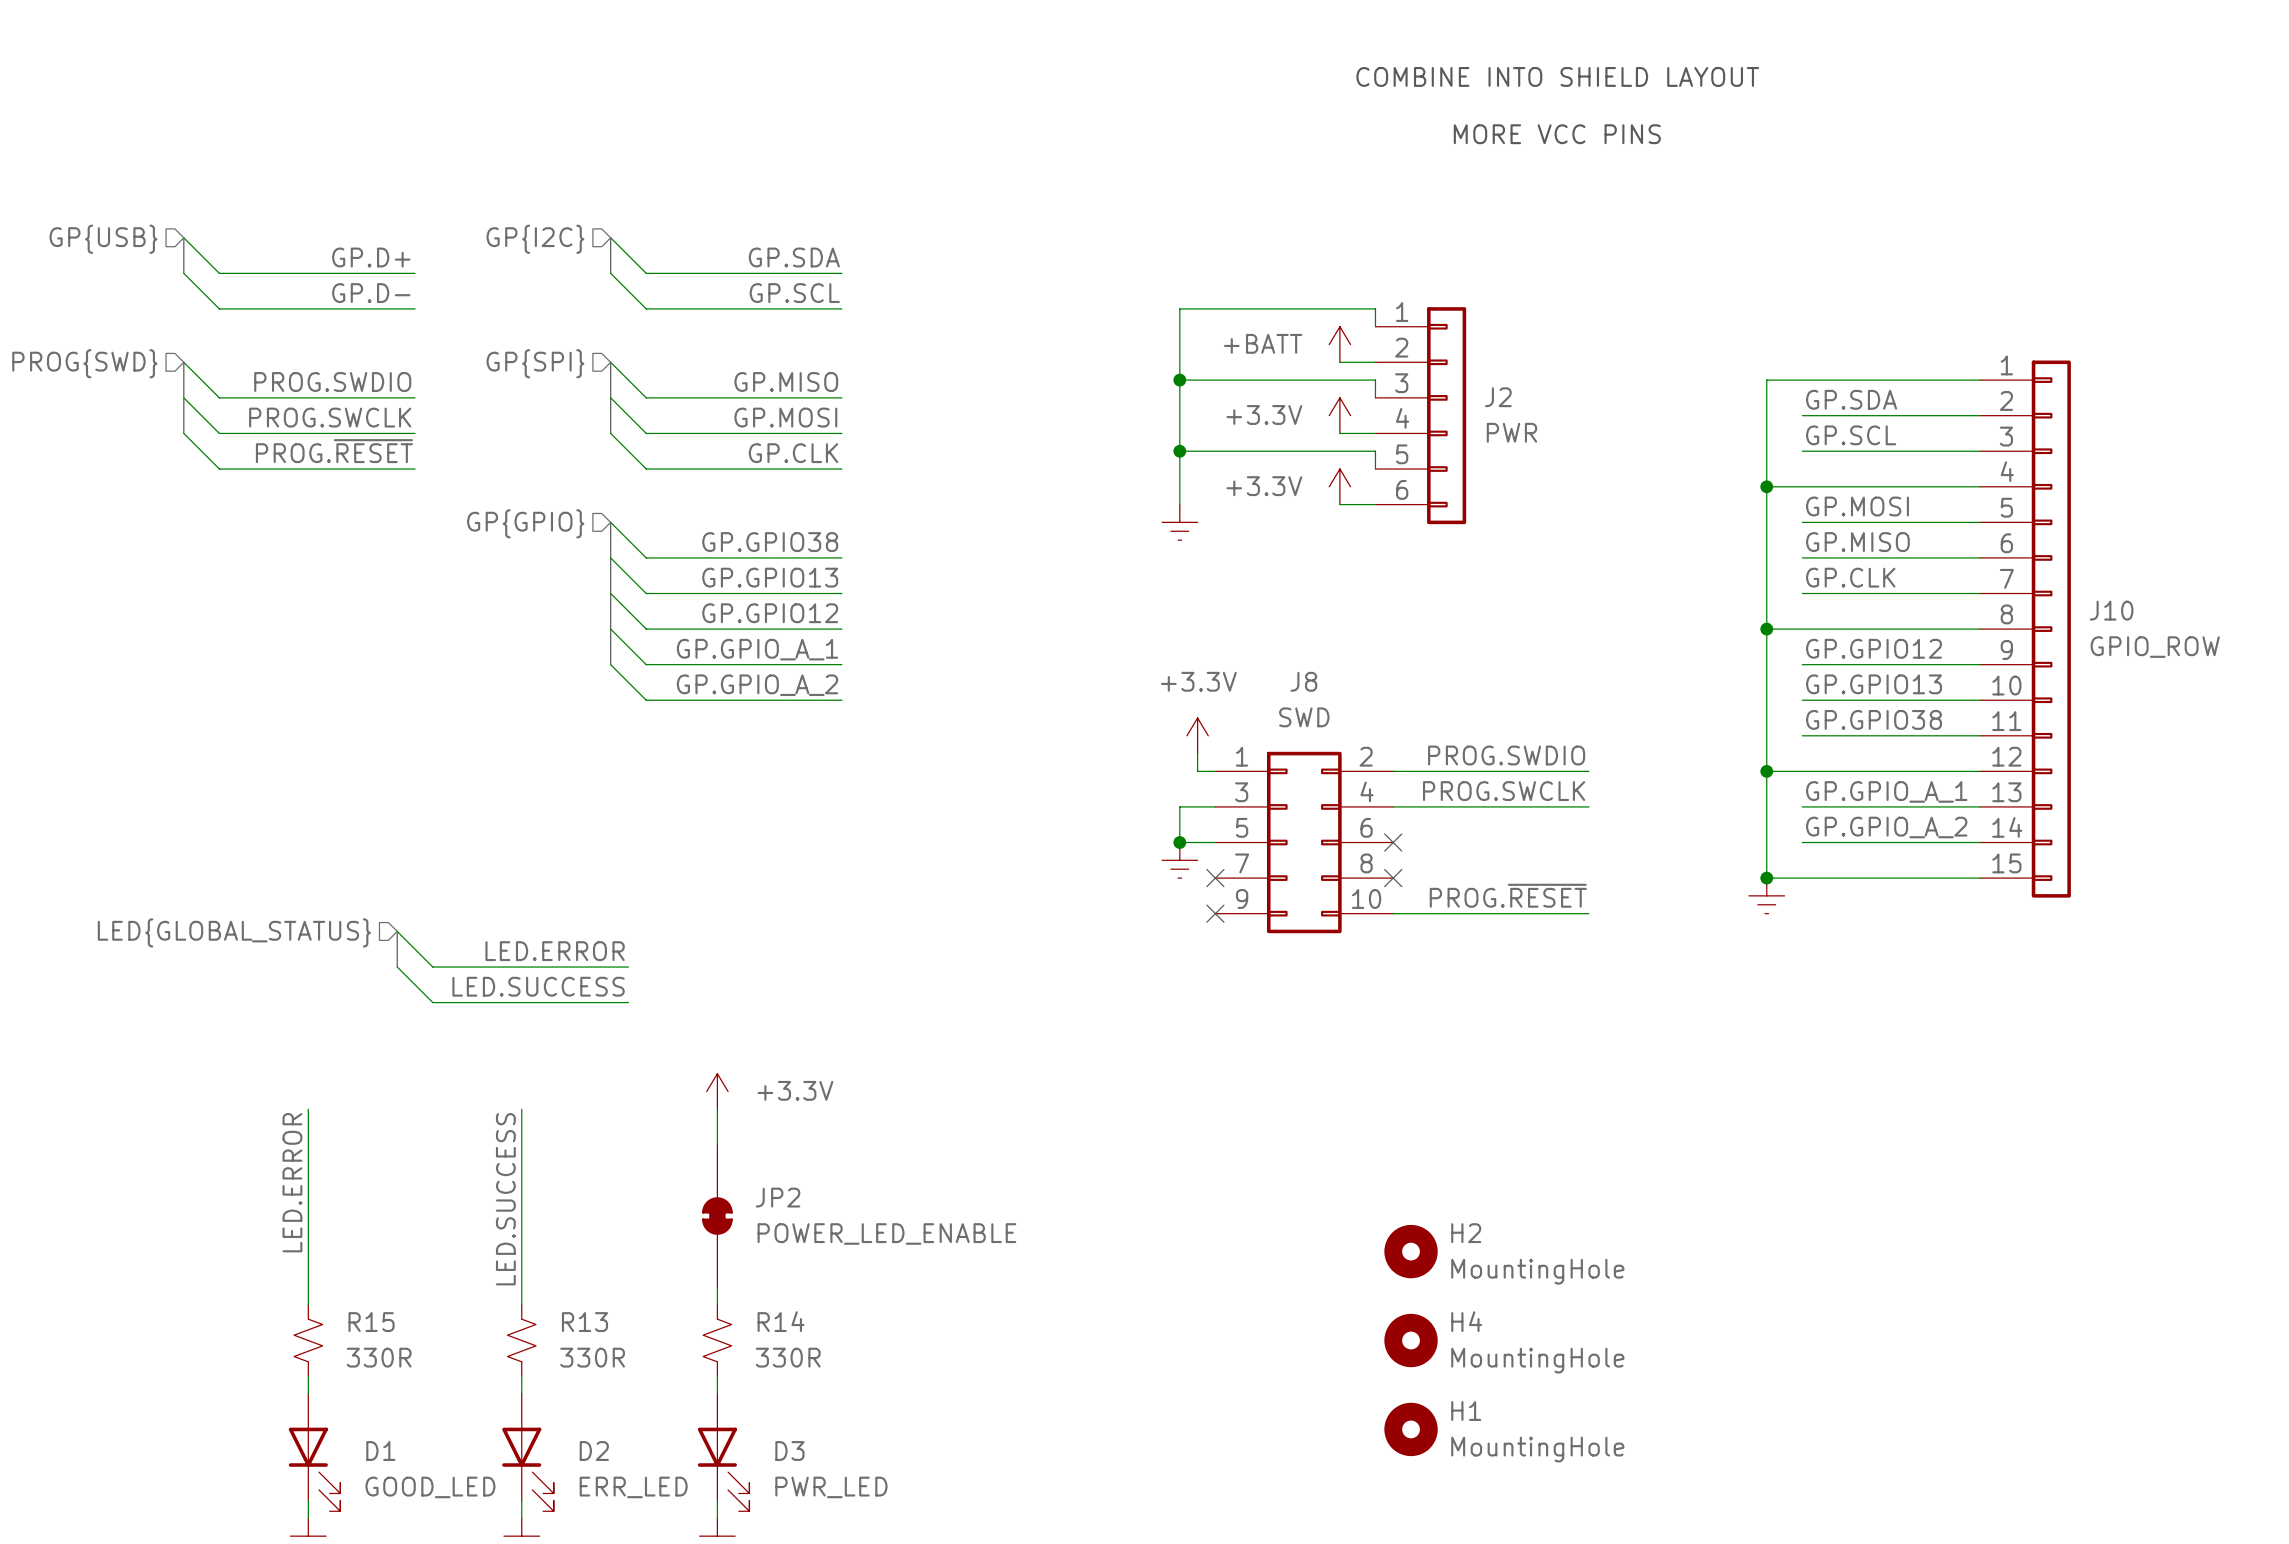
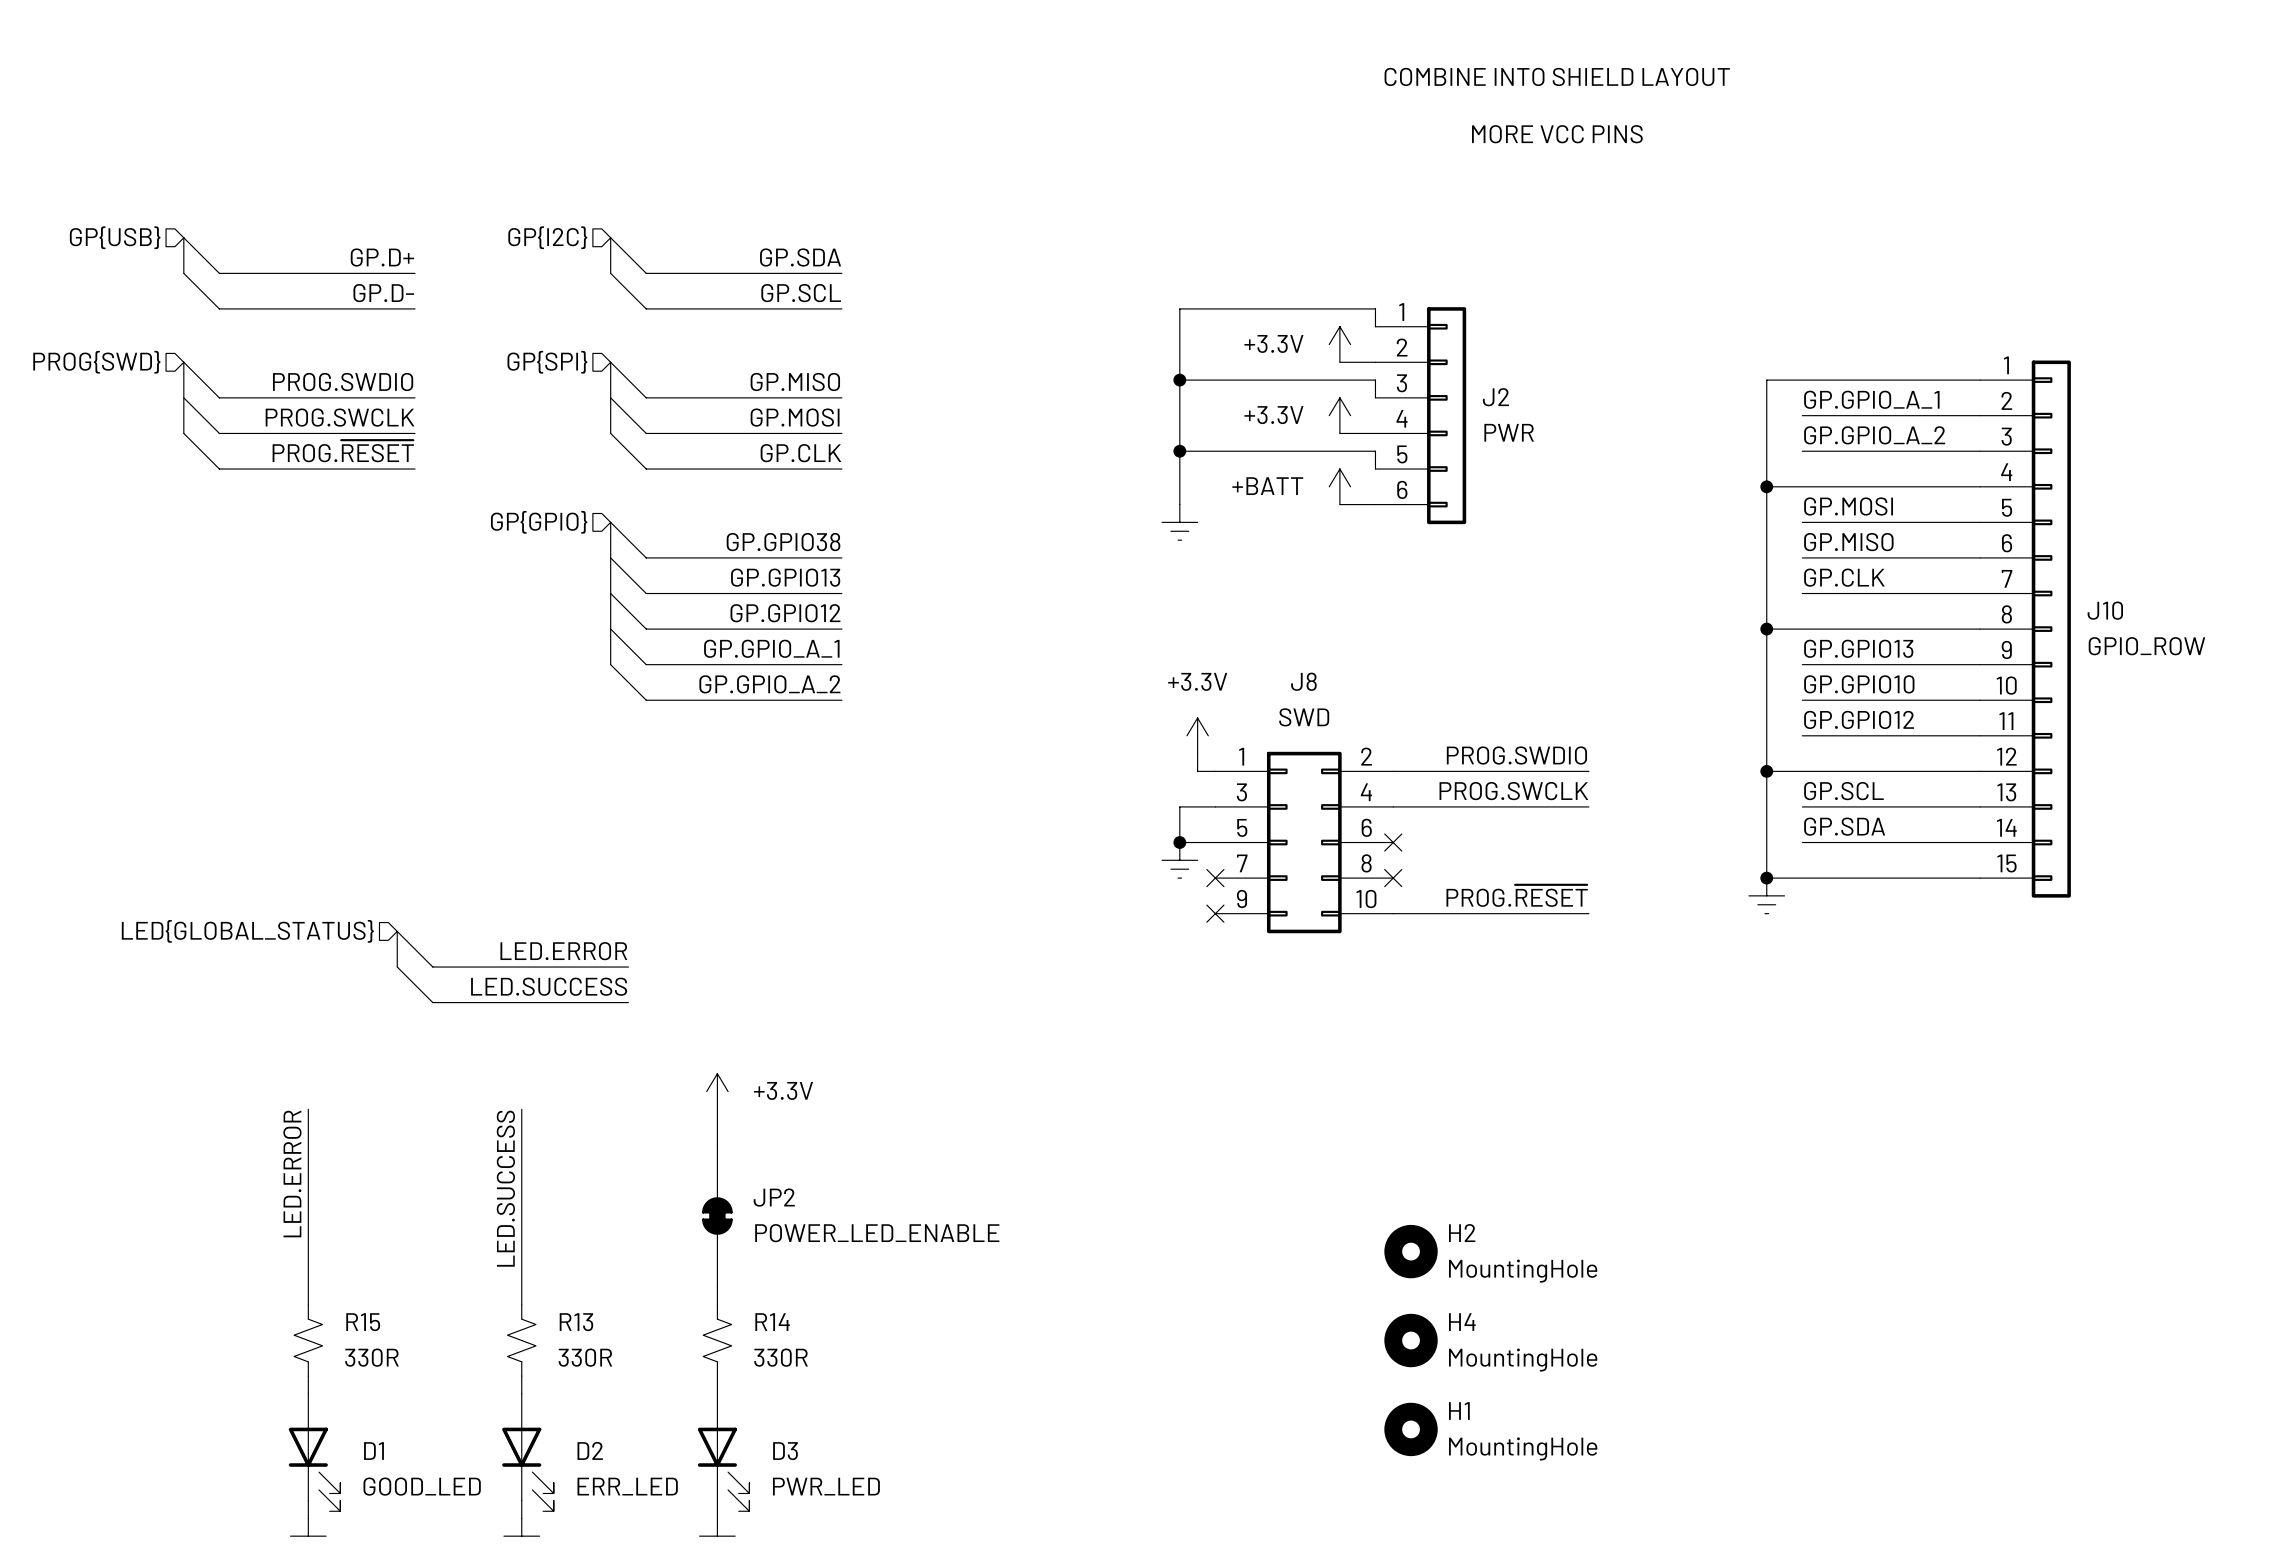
power symbol: +BATT (1339, 344) -> +3.3V (1339, 344)
label: GP.SDA (1851, 399) -> GP.GPIO_A_1 (1871, 399)
label: GP.SCL (1851, 435) -> GP.GPIO_A_2 (1874, 435)
power symbol: +3.3V (1339, 486) -> +BATT (1339, 486)
label: GP.GPIO12 (1874, 648) -> GP.GPIO13 (1858, 648)
label: GP.GPIO13 (1874, 684) -> GP.GPIO10 (1859, 684)
label: GP.GPIO38 (1874, 719) -> GP.GPIO12 (1859, 719)
label: GP.GPIO_A_1 (1886, 791) -> GP.SCL (1843, 791)
label: GP.GPIO_A_2 (1886, 827) -> GP.SDA (1844, 826)

